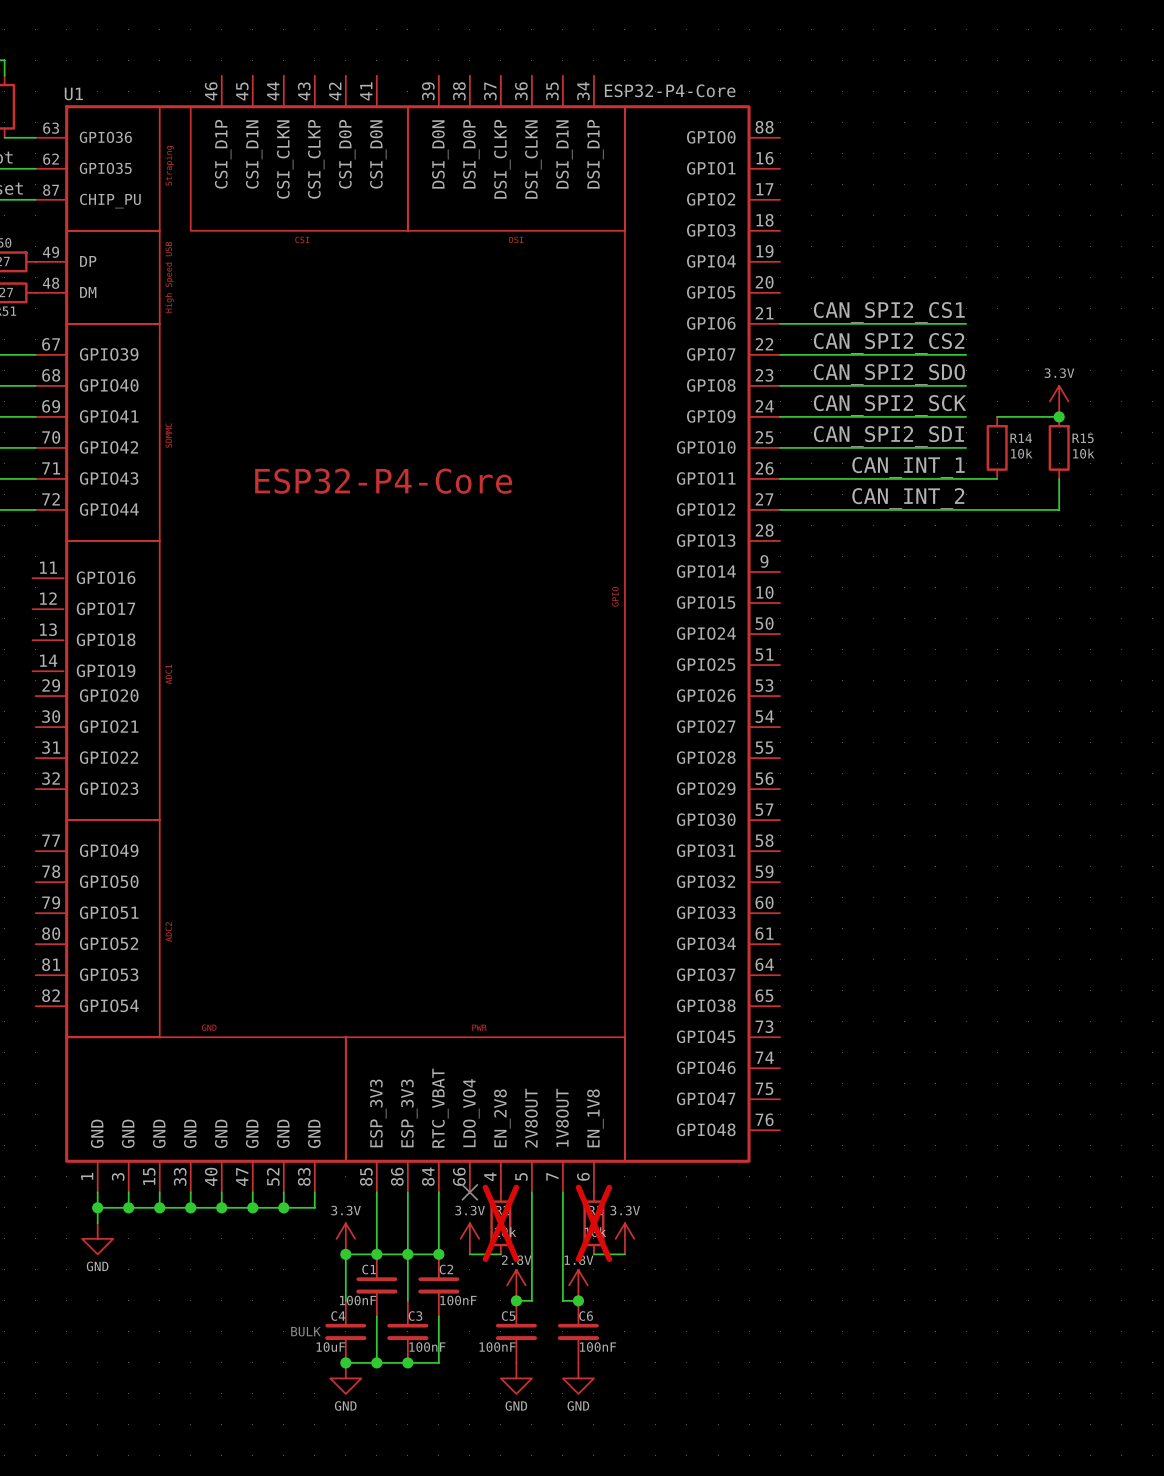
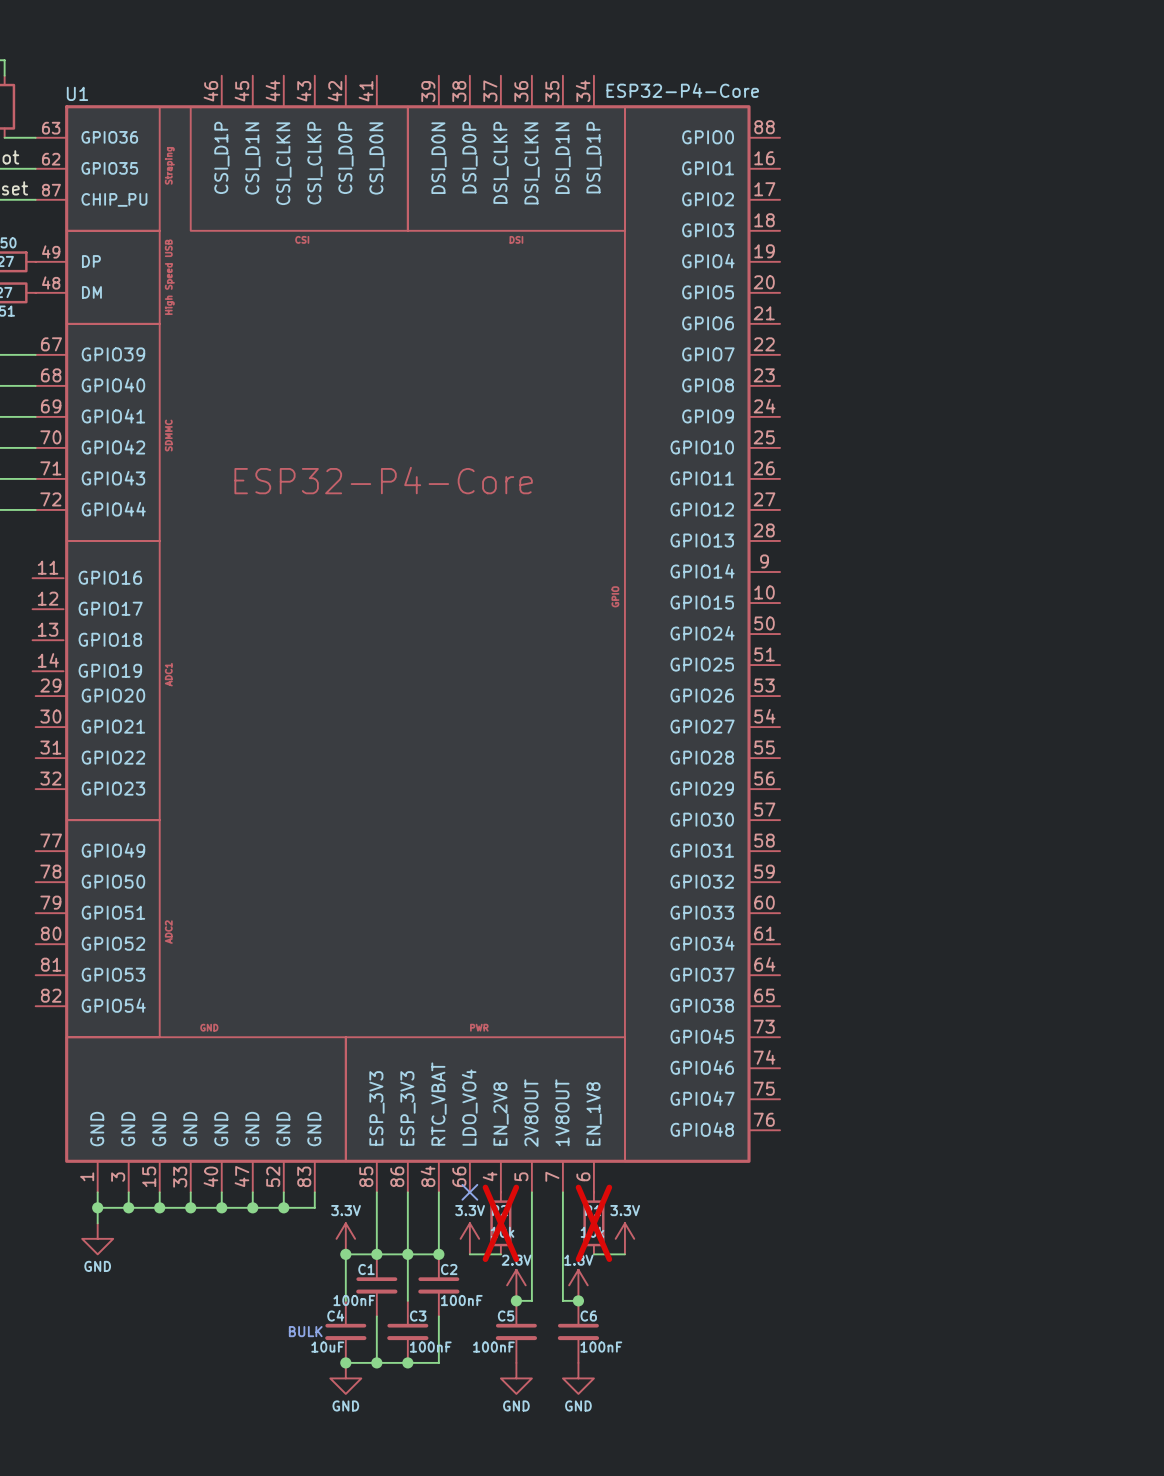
label: CAN_SPI2_CS1 (889, 312) -> none
wire: (780, 323) (966, 323) -> none
label: CAN_SPI2_CS2 (889, 343) -> none
wire: (780, 354) (966, 354) -> none
label: CAN_SPI2_SDO (889, 374) -> none
wire: (780, 385) (966, 385) -> none
power symbol: 3.3V (1059, 401) -> none
label: CAN_SPI2_SCK (889, 405) -> none
wire: (780, 416) (966, 416) -> none
wire: (997, 416) (1059, 416) -> none
junction: (1059, 416) -> none
label: CAN_SPI2_SDI (888, 436) -> none
wire: (780, 447) (966, 447) -> none
R14: 10k (997, 447) -> none
R15: 10k (1059, 447) -> none
label: CAN_INT_1 (908, 467) -> none
wire: (780, 478) (997, 478) -> none
wire: (1059, 478) (1059, 509) (780, 509) -> none
label: CAN_INT_2 (908, 498) -> none

